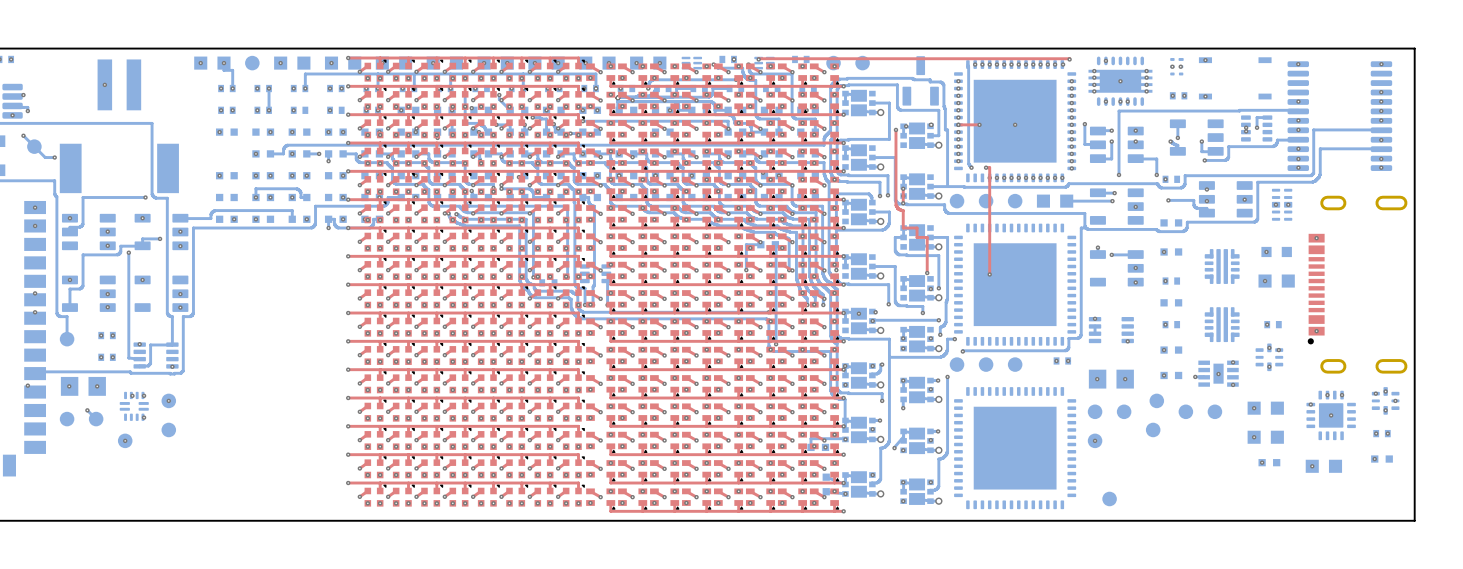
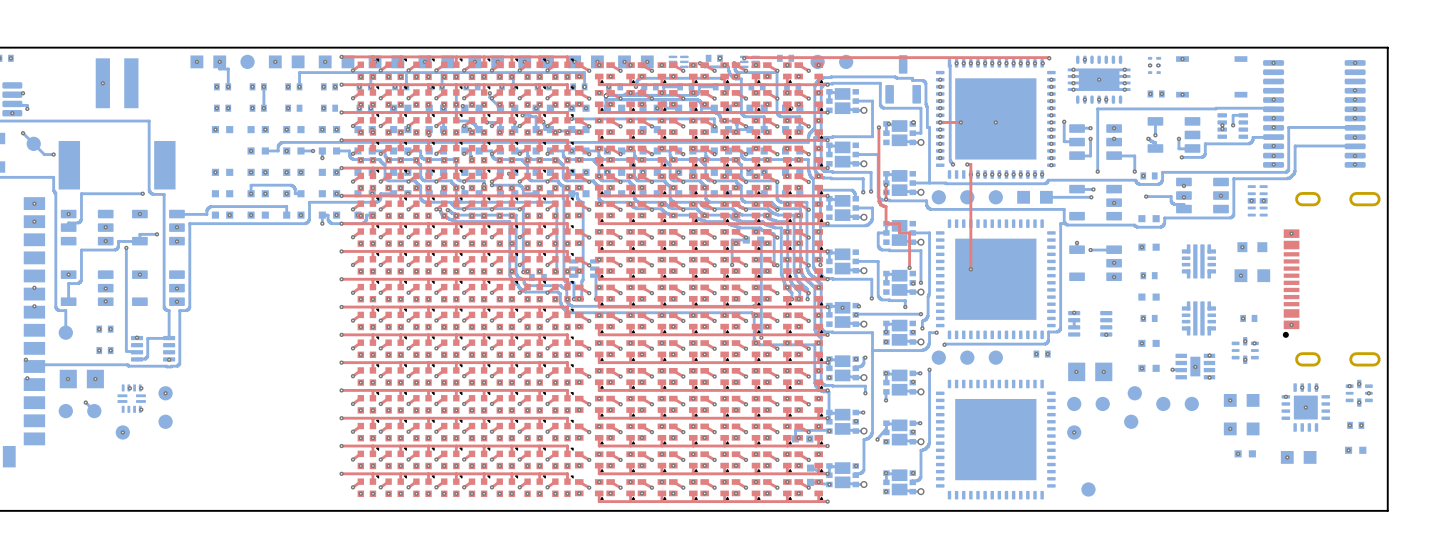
via: none -> (25, 359)

